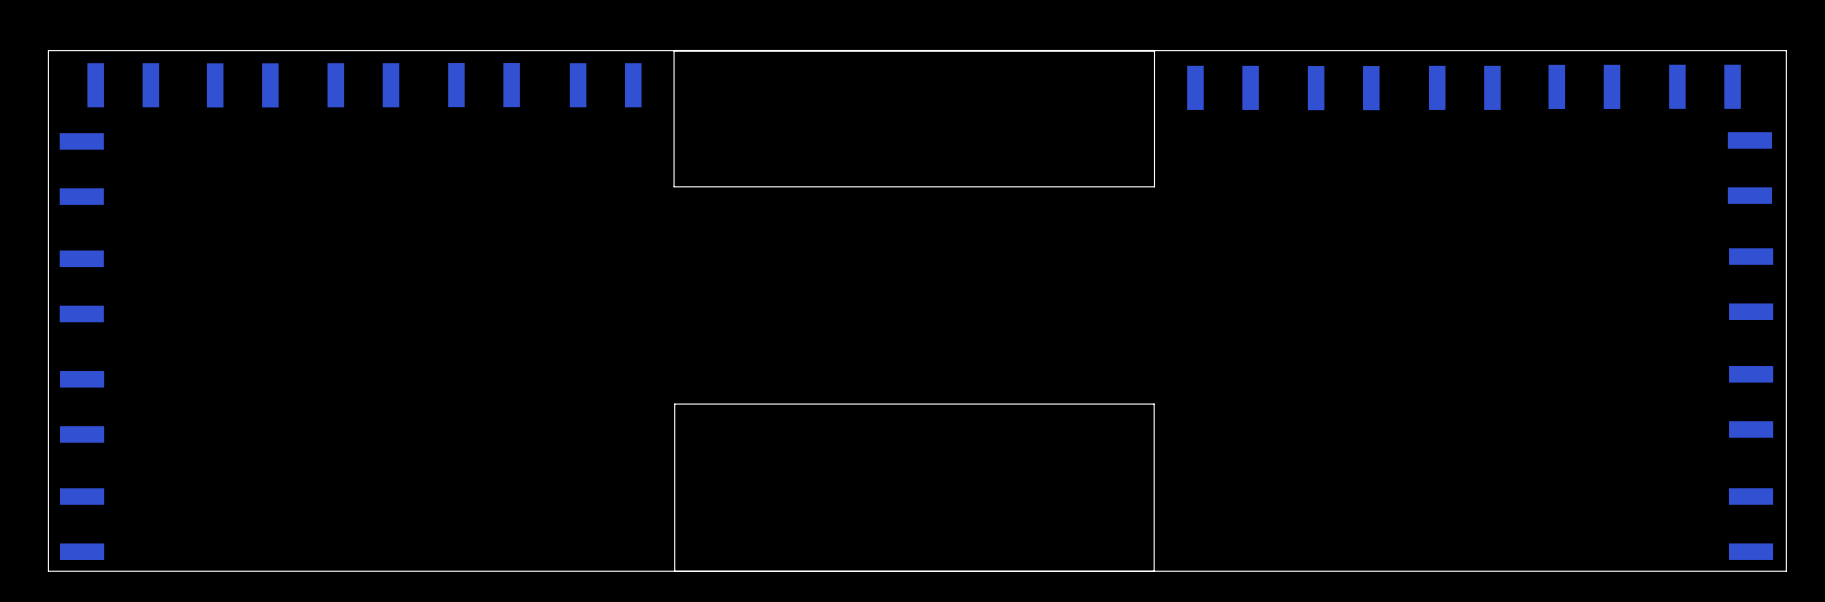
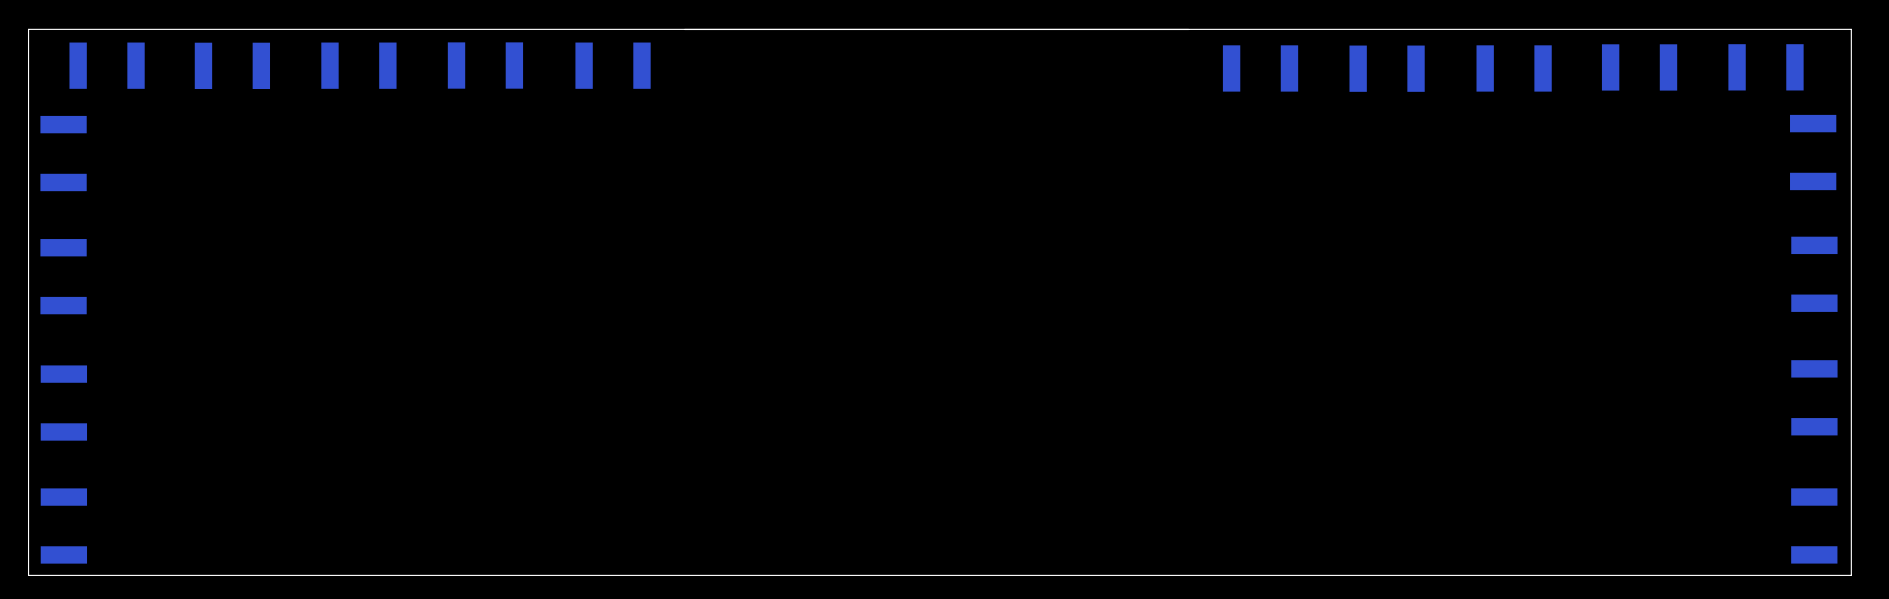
board edge: (1154, 50) (1154, 186) (674, 186) (674, 50) (1154, 50) -> none
board edge: (1154, 404) (674, 404) (674, 571) (1154, 571) (1154, 404) -> none

